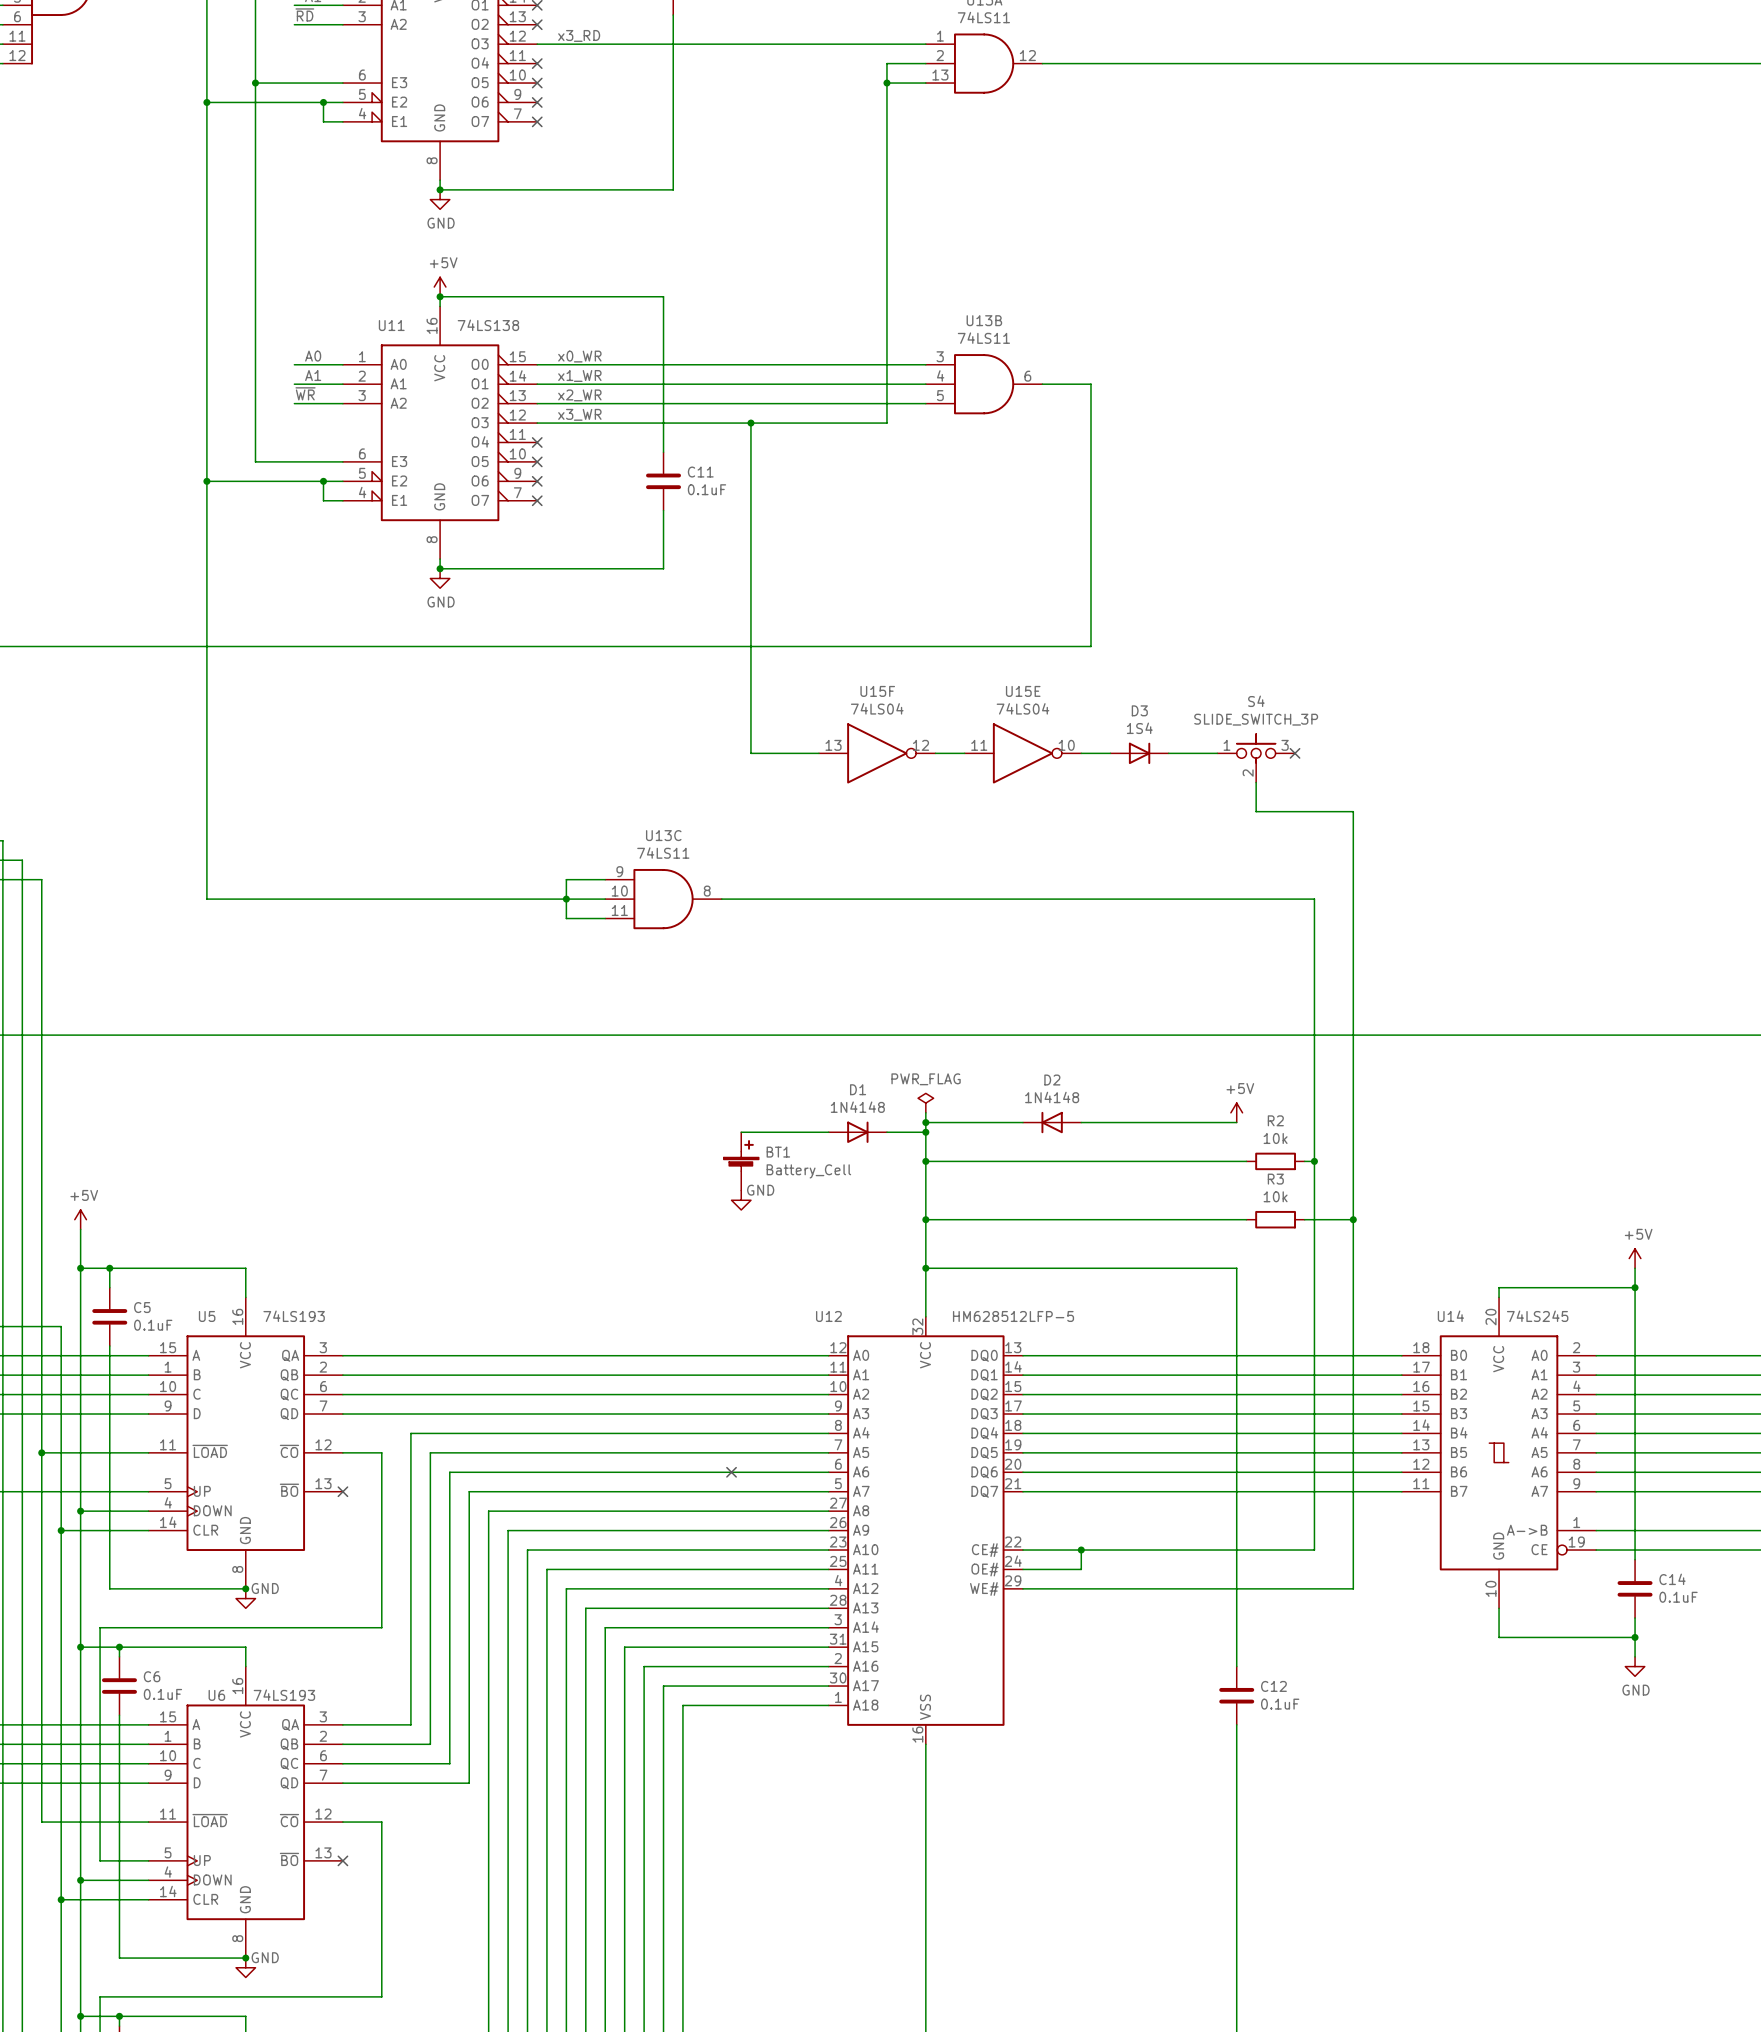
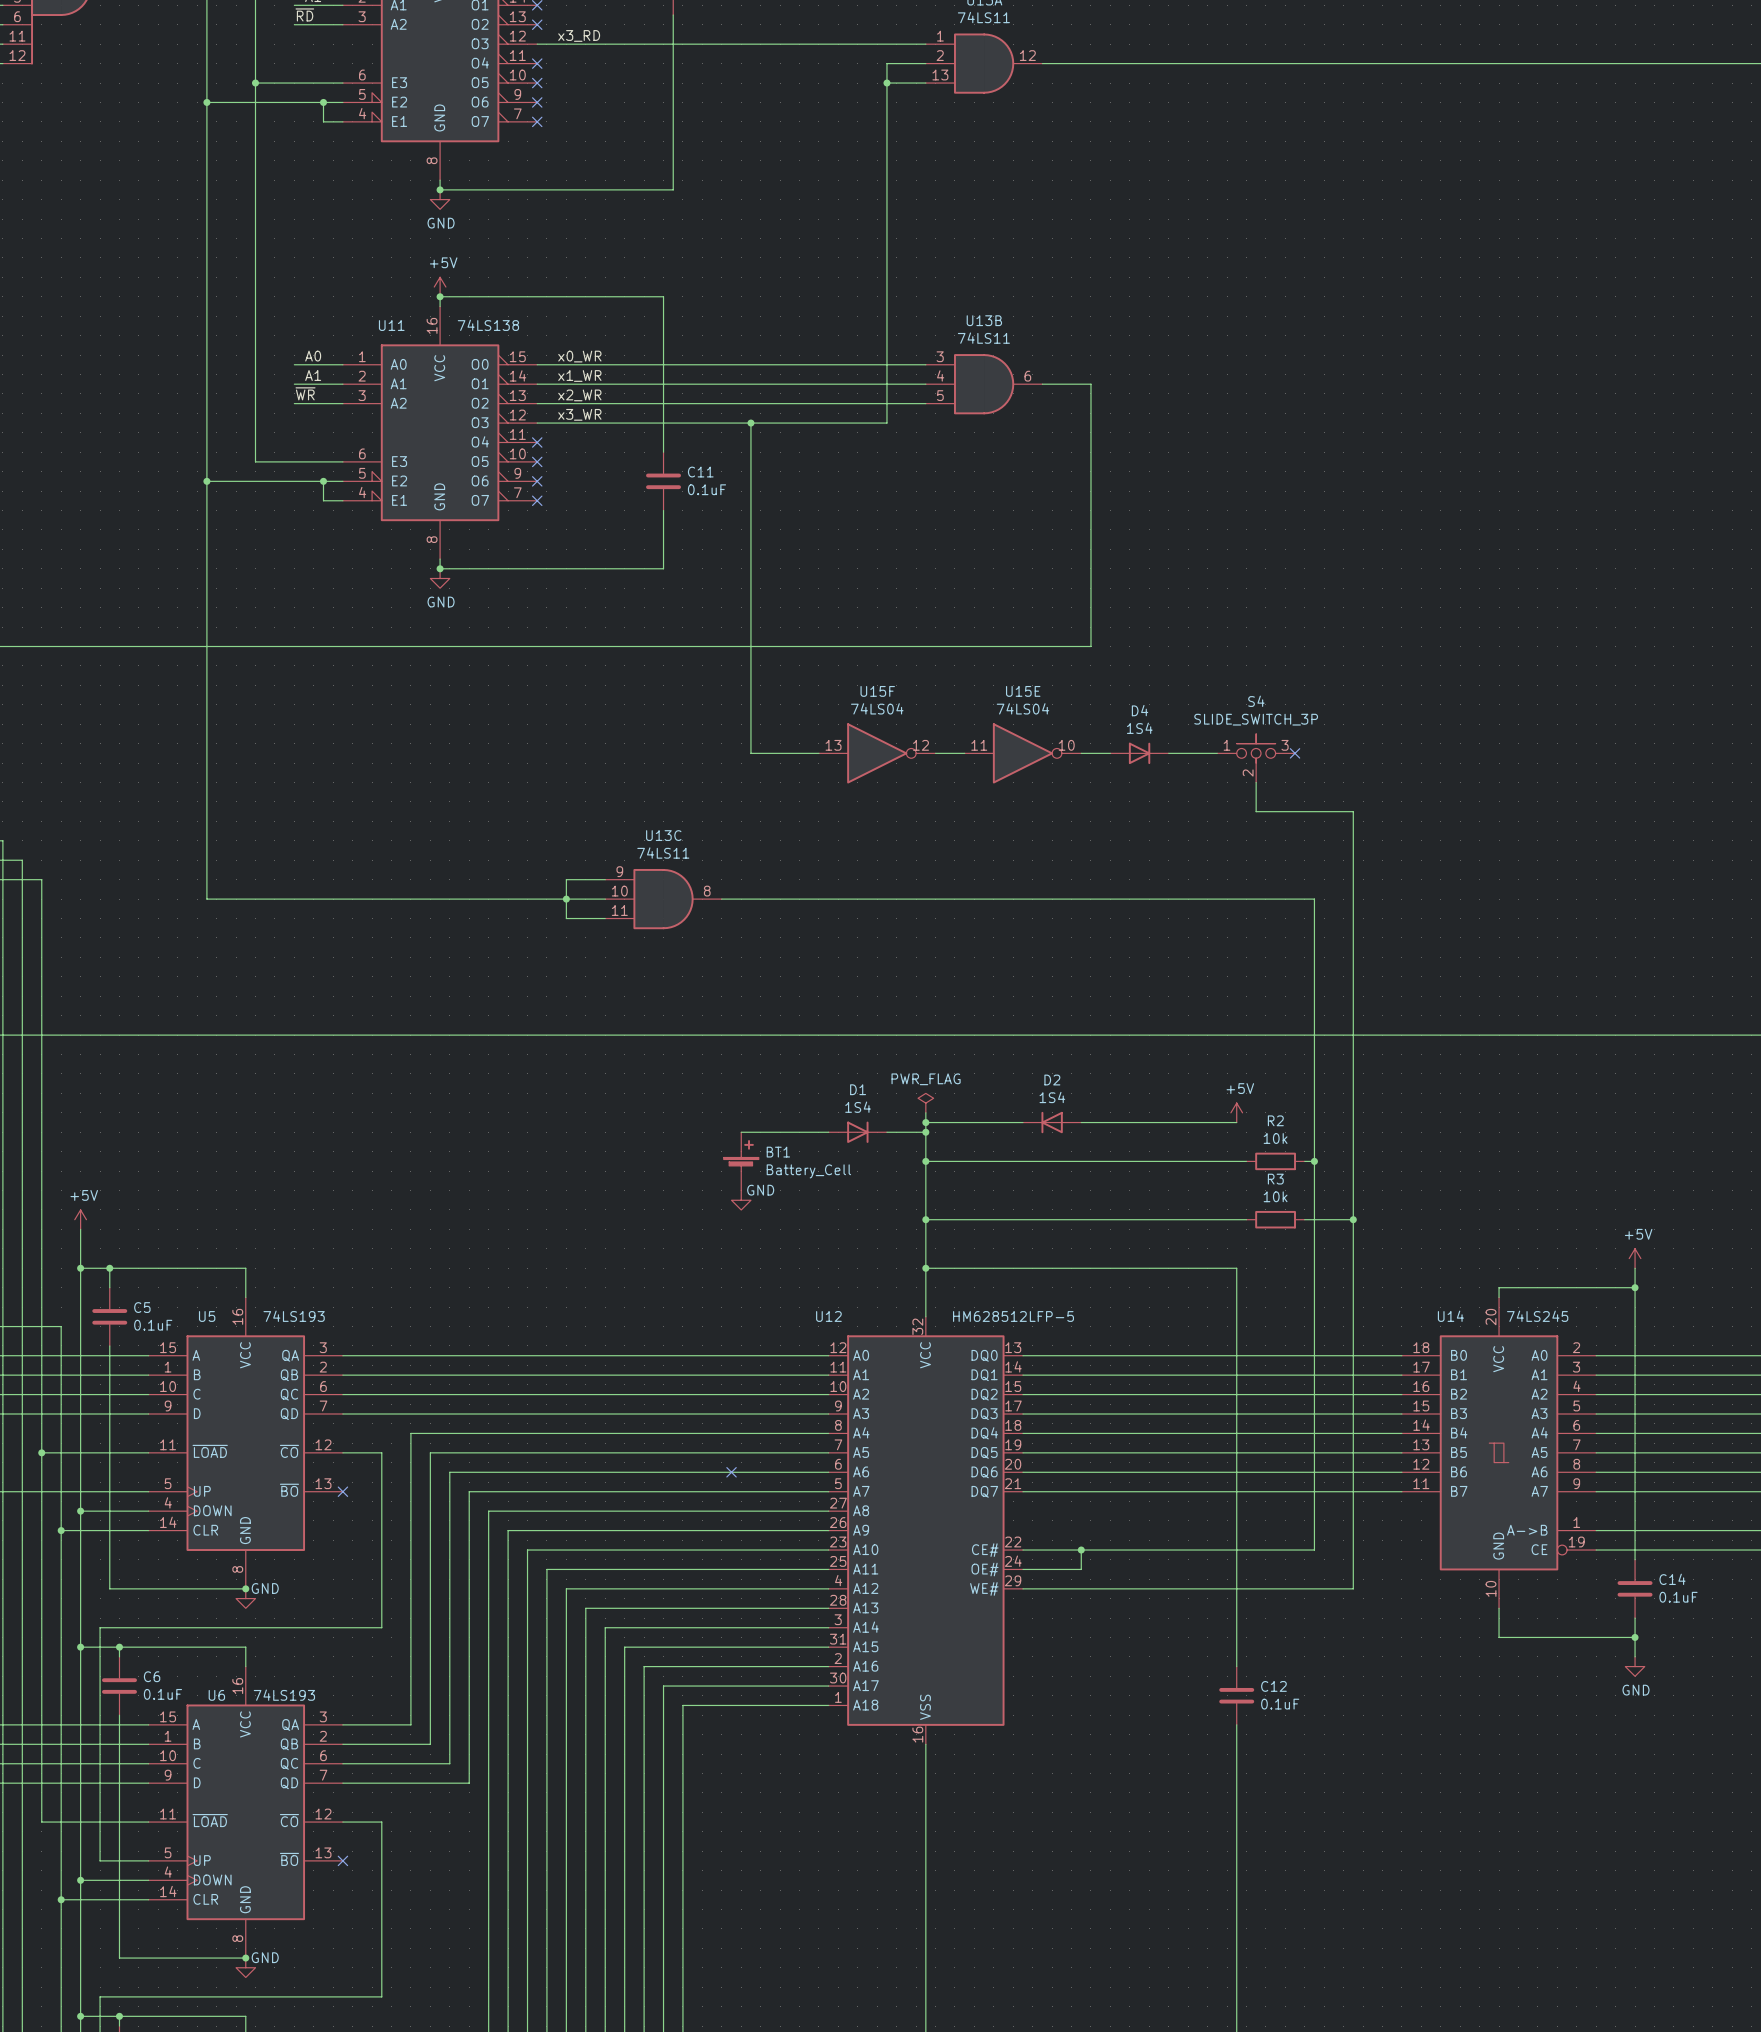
D3 name: D3 (1139, 710) -> D4 (1140, 710)
D2 value: 1N4148 (1052, 1097) -> 1S4 (1052, 1097)
D1 value: 1N4148 (857, 1107) -> 1S4 (858, 1107)

